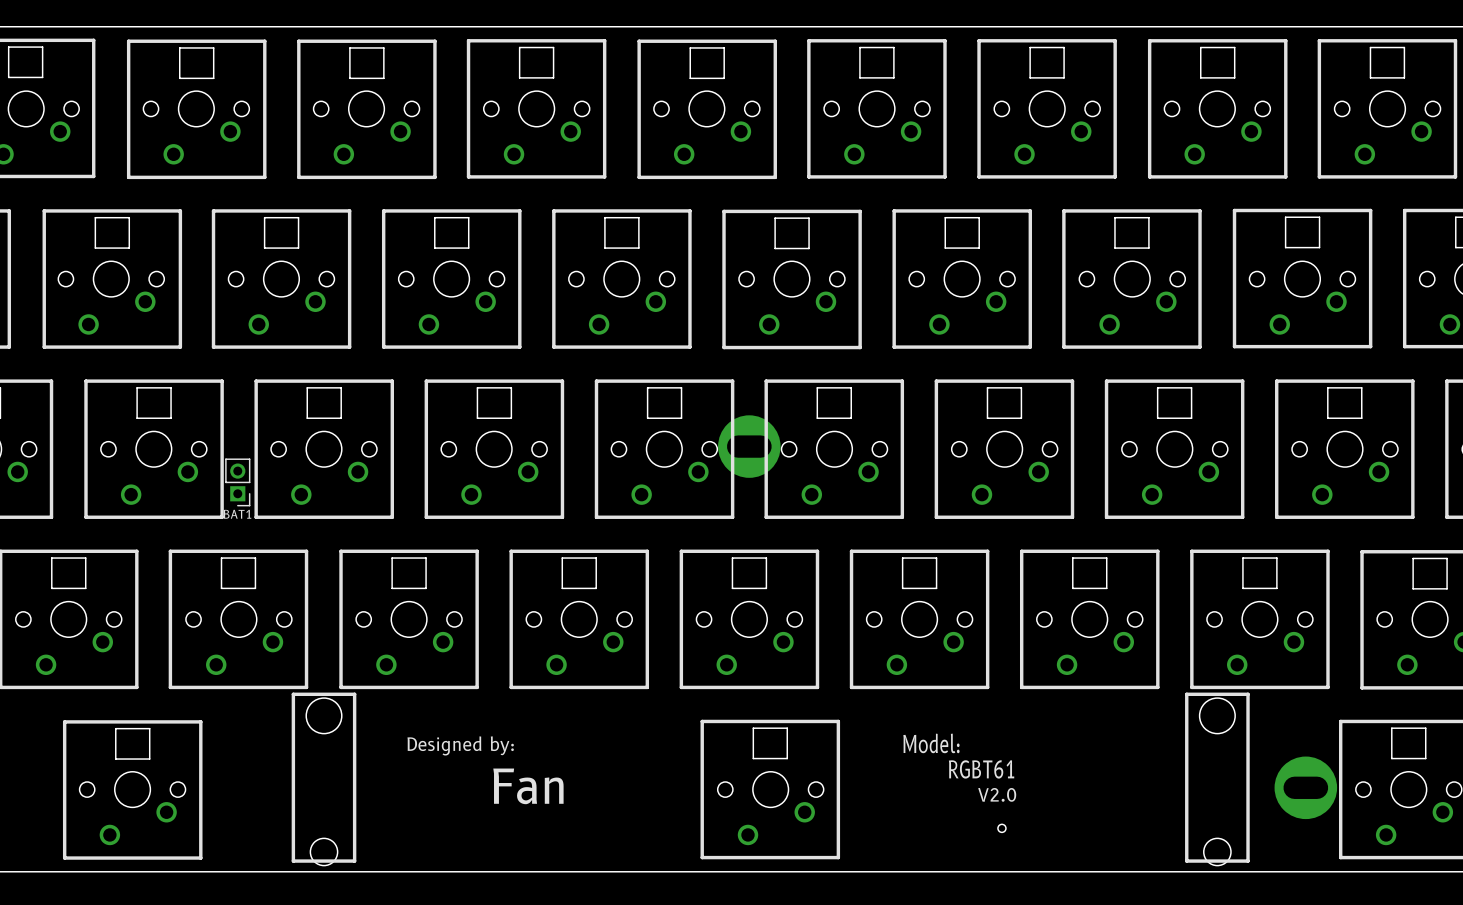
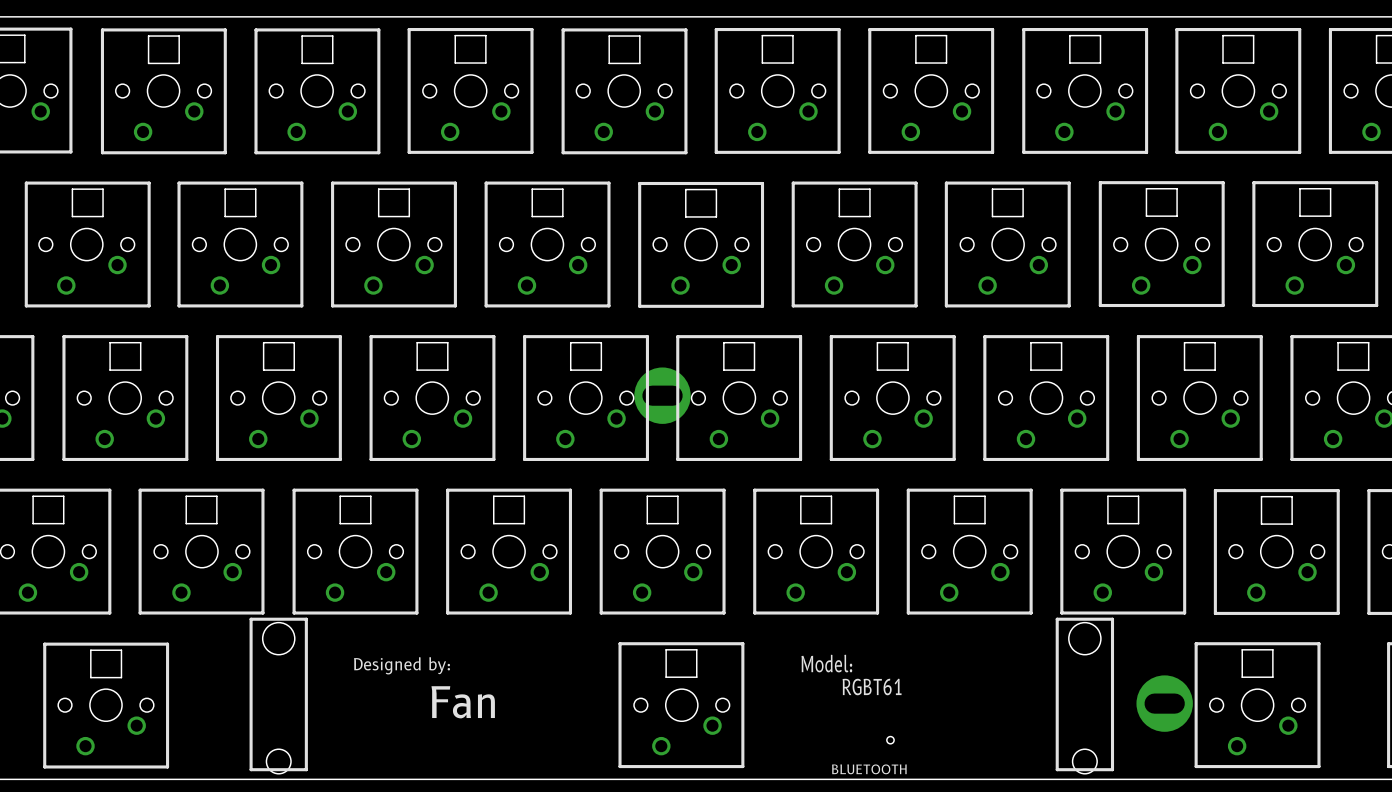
BAT1: (237, 482) -> none
text: V2.0 (997, 794) -> none
BLUETOOTH name: none -> BLUETOOTH (869, 769)

